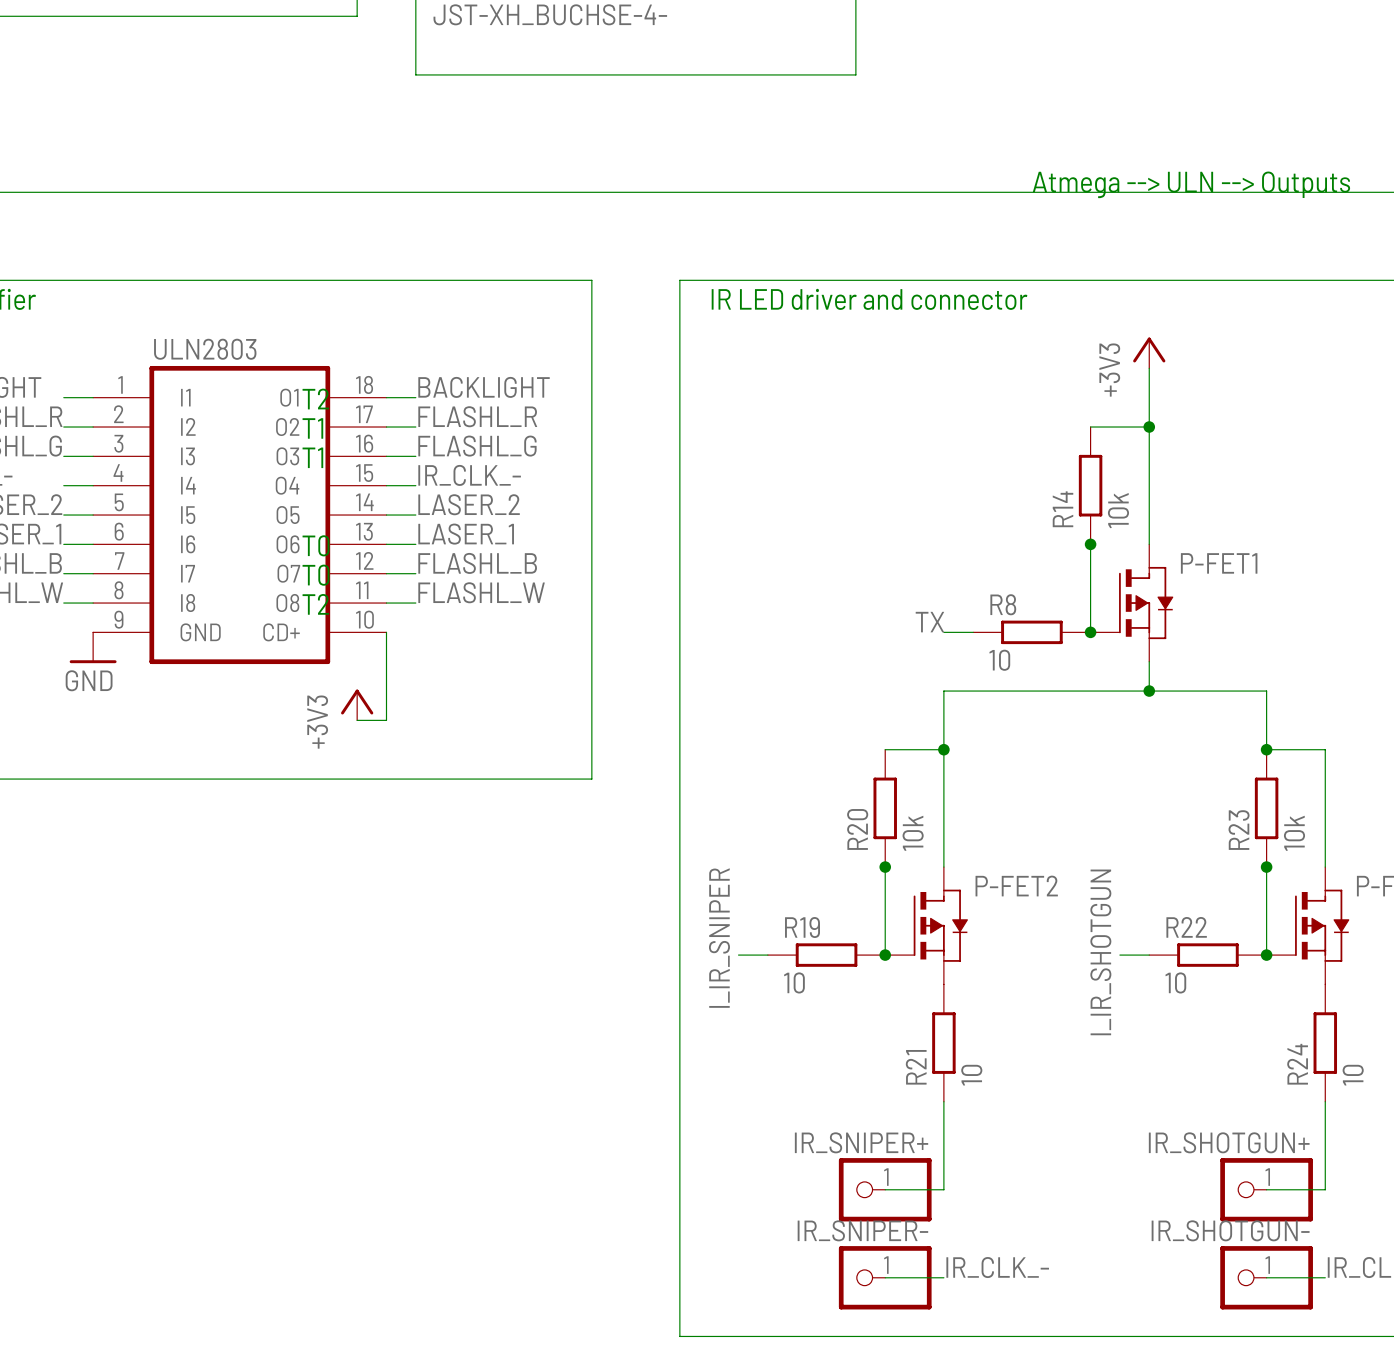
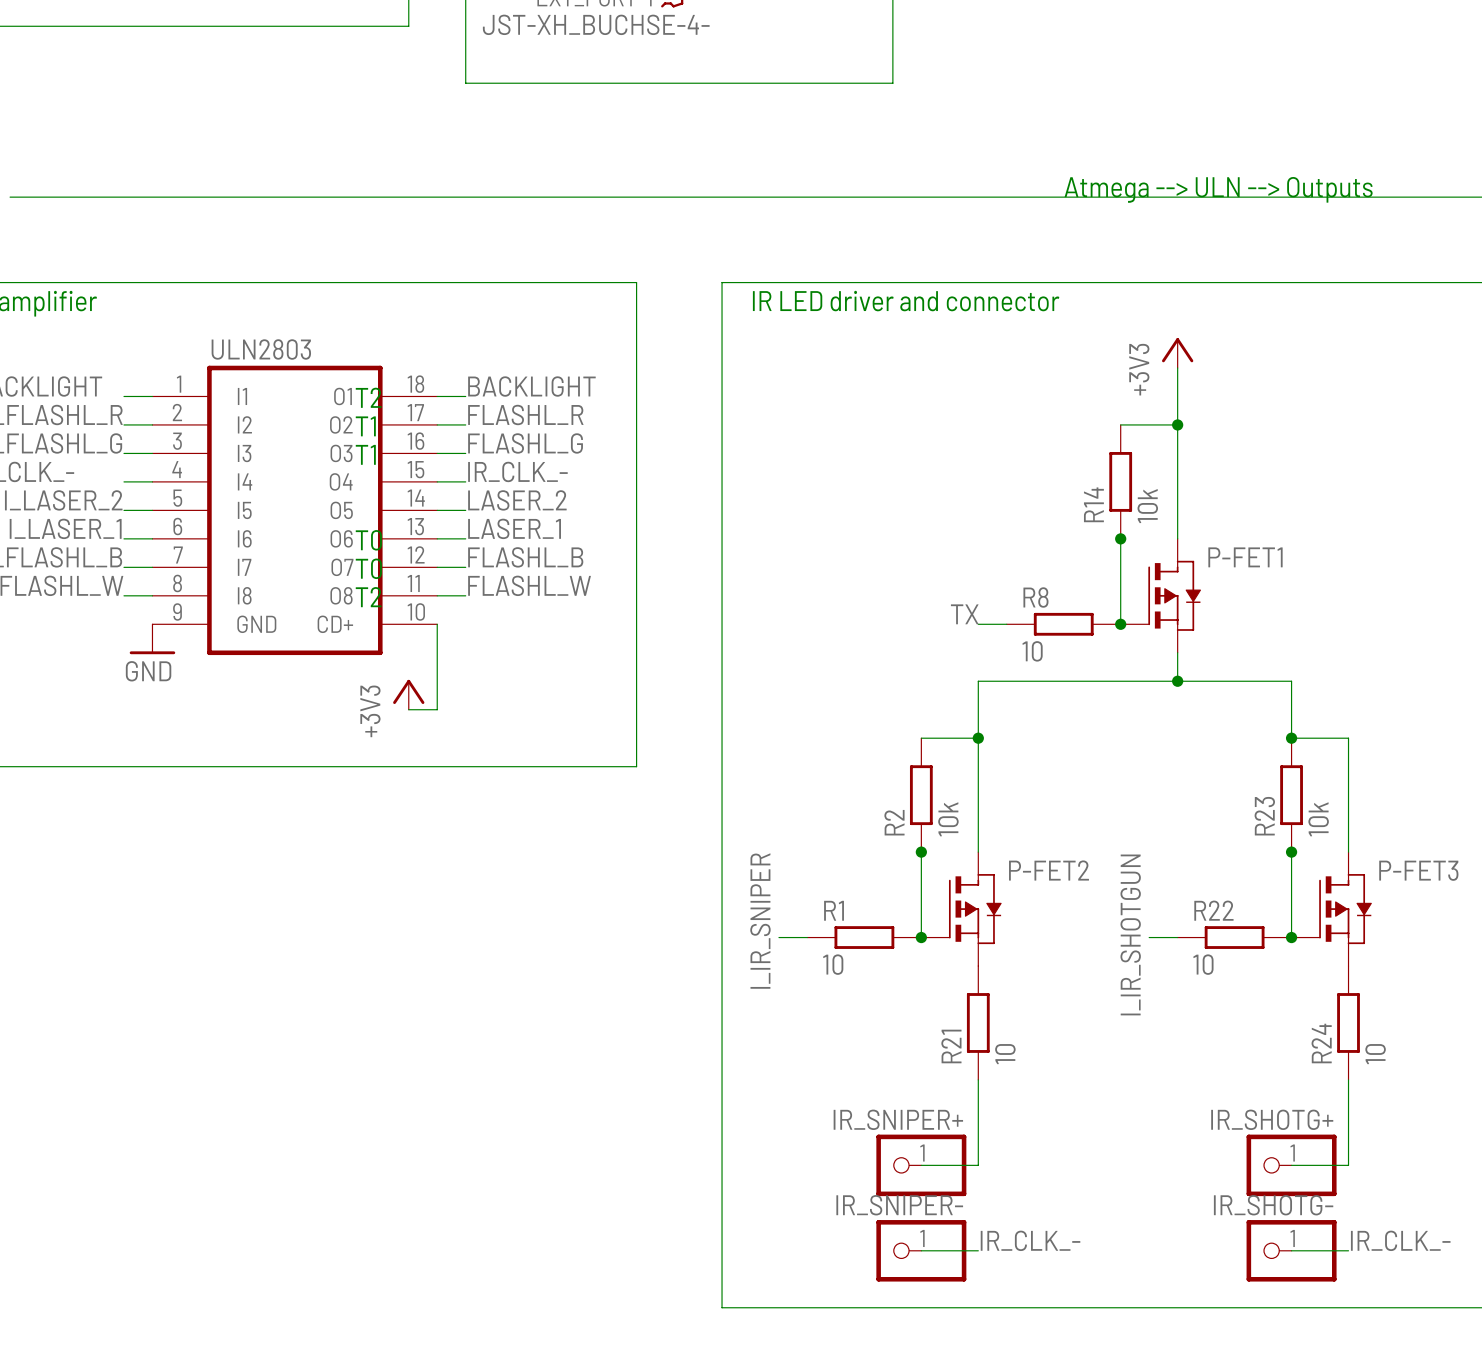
R20 name: R20 (857, 829) -> R2 (894, 822)
R19 name: R19 (802, 927) -> R1 (834, 910)
IR_SHOTGUN+ name: IR_SHOTGUN+ (1229, 1142) -> IR_SHOTG+ (1272, 1119)
IR_SHOTGUN- name: IR_SHOTGUN- (1230, 1230) -> IR_SHOTG- (1273, 1205)

